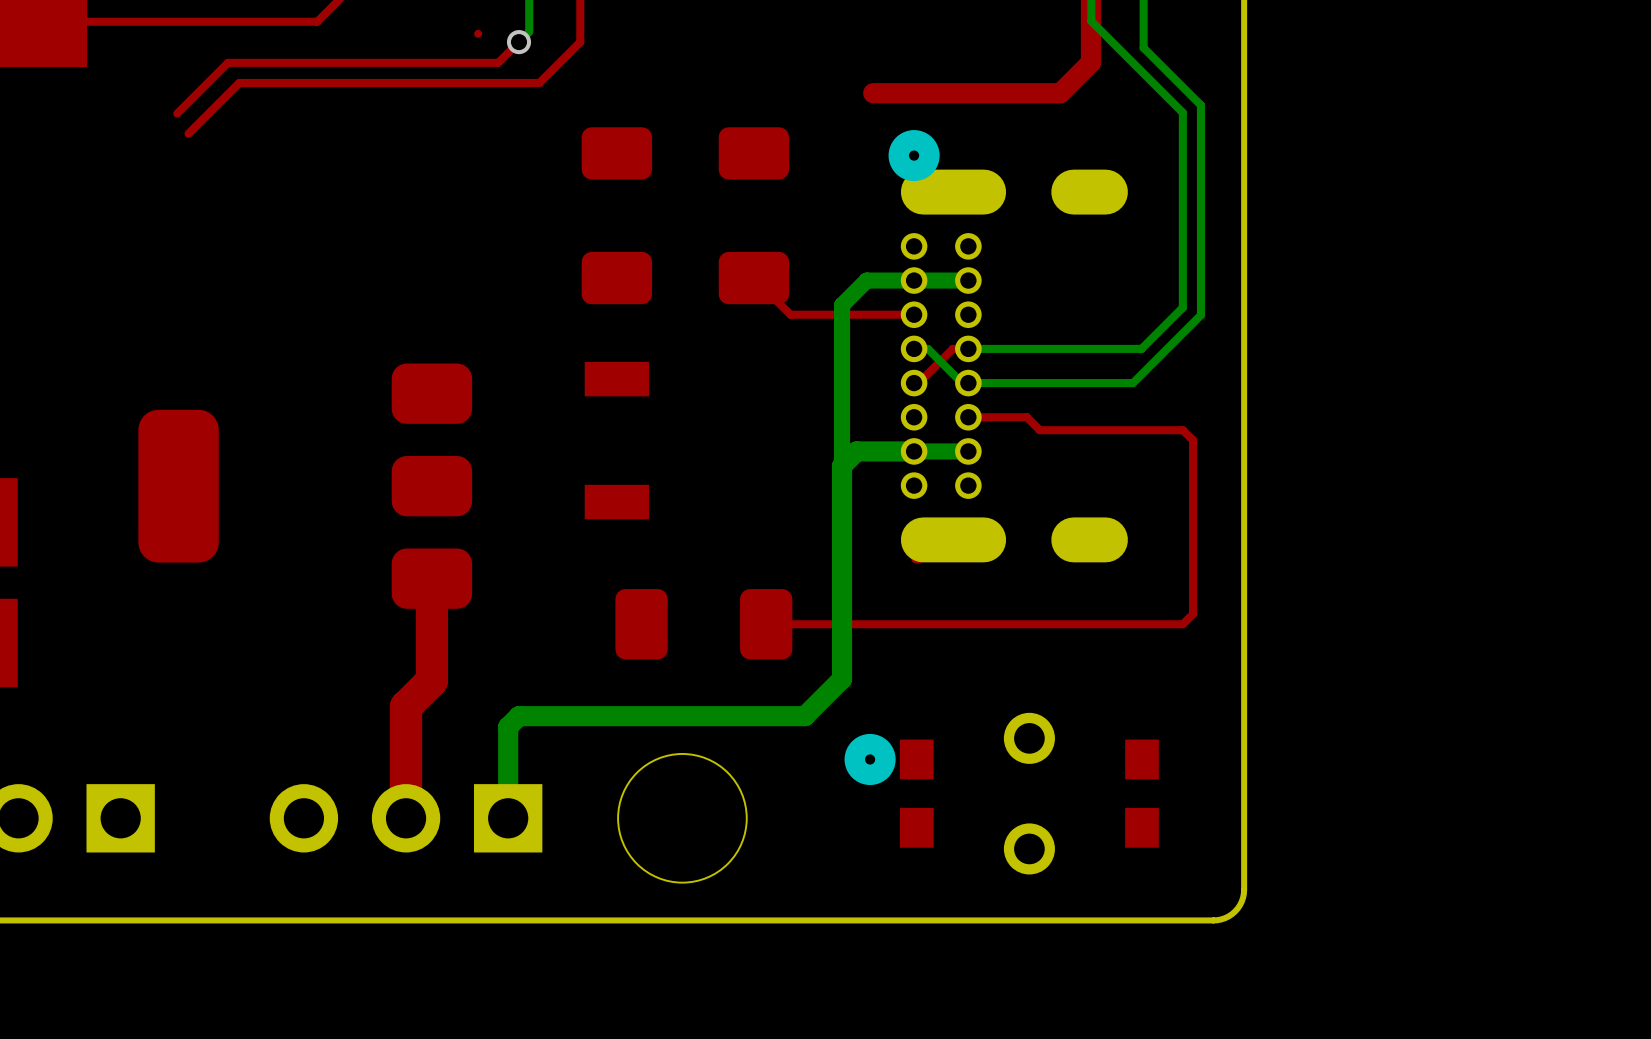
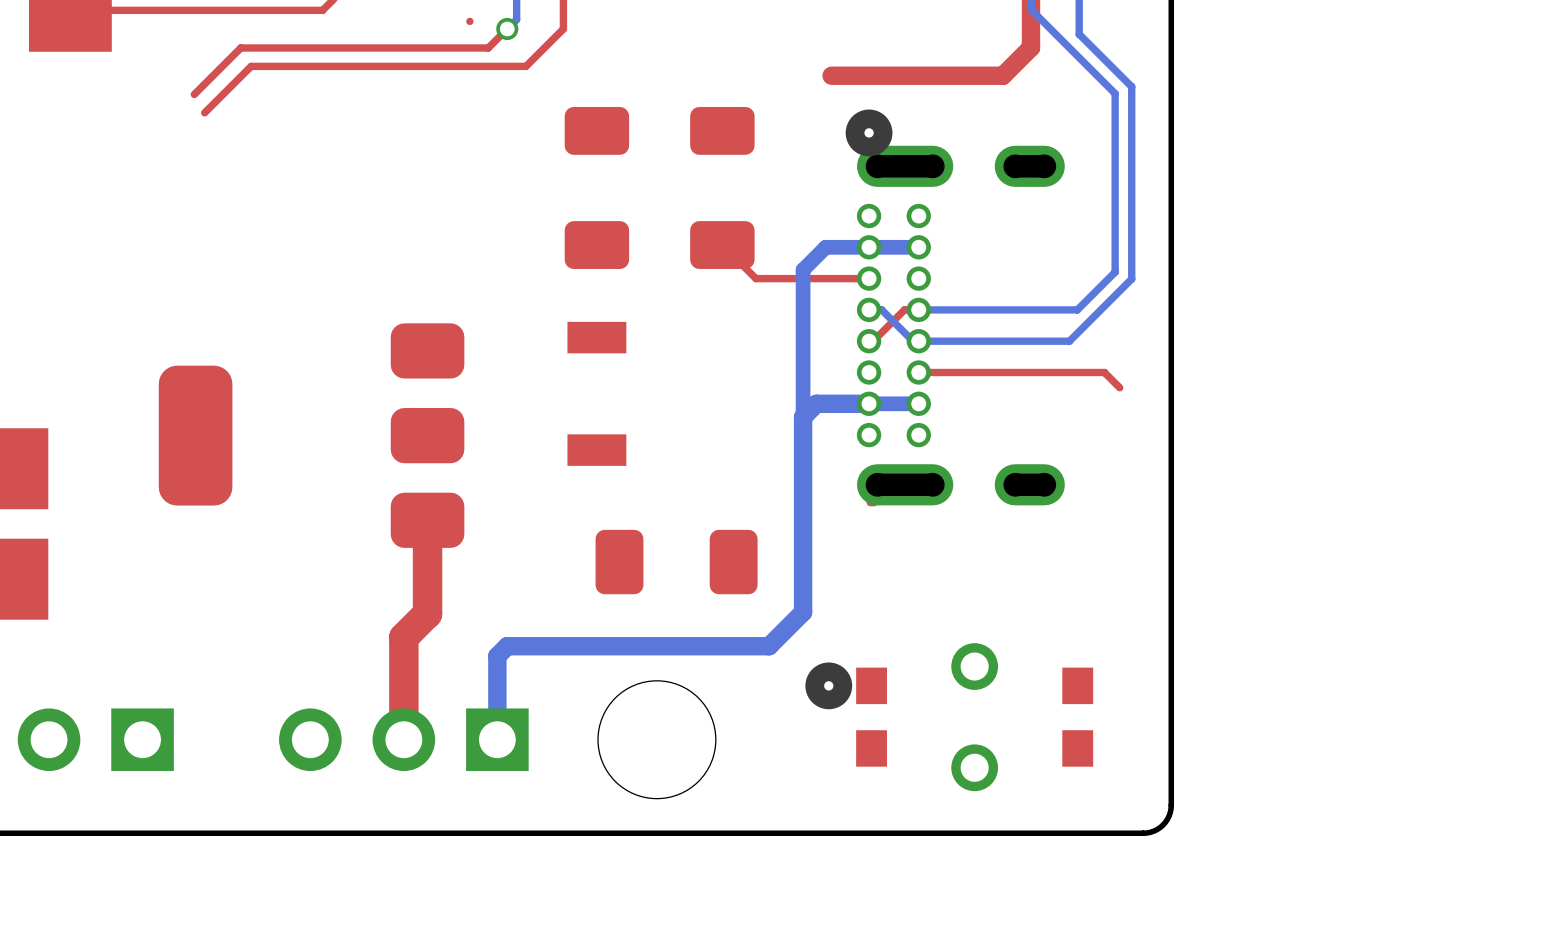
top track: (1026, 417) (1039, 430) (1182, 430) (1193, 440) (1193, 614) (1182, 624) (766, 624) -> (972, 372) (1104, 372) (1119, 387)

